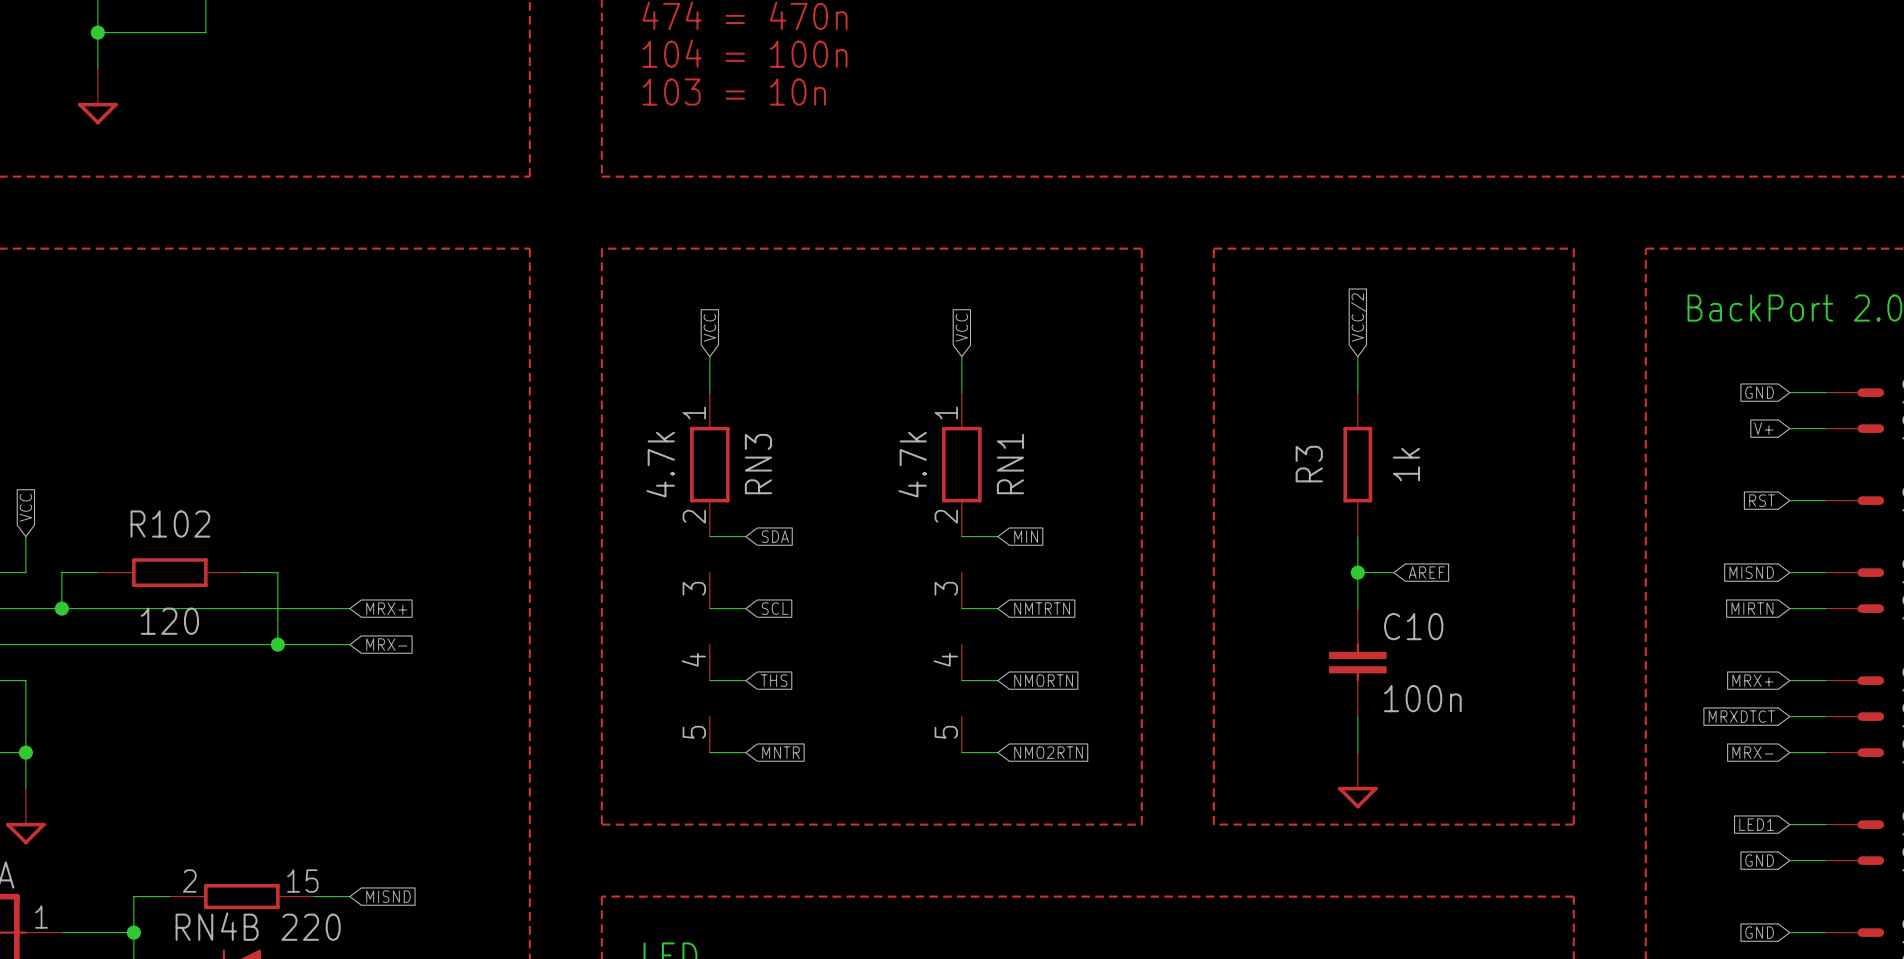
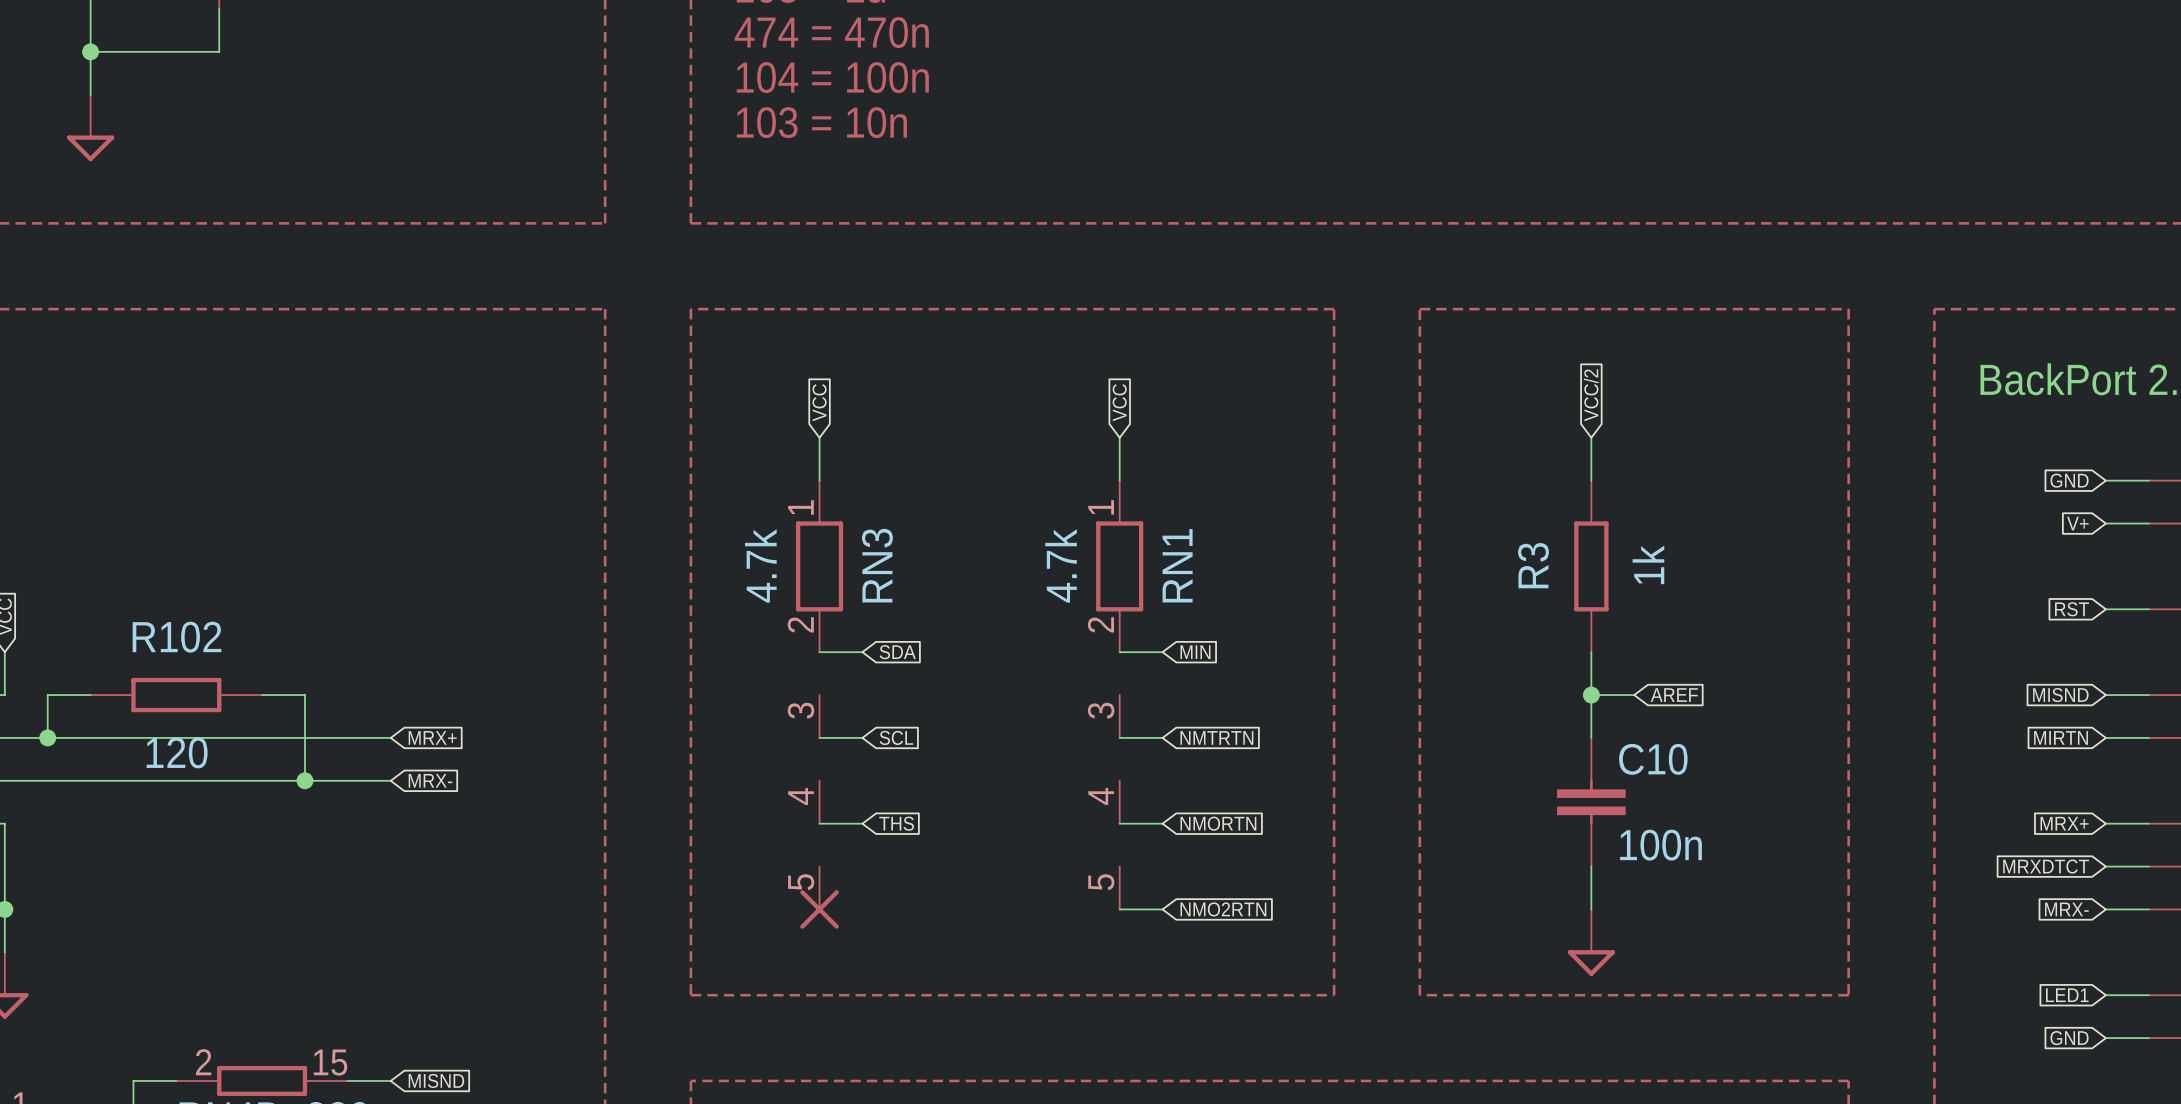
wire: (709, 752) (745, 752) -> none
part: none -> (819, 909)
global label: MNTR (781, 752) -> none

